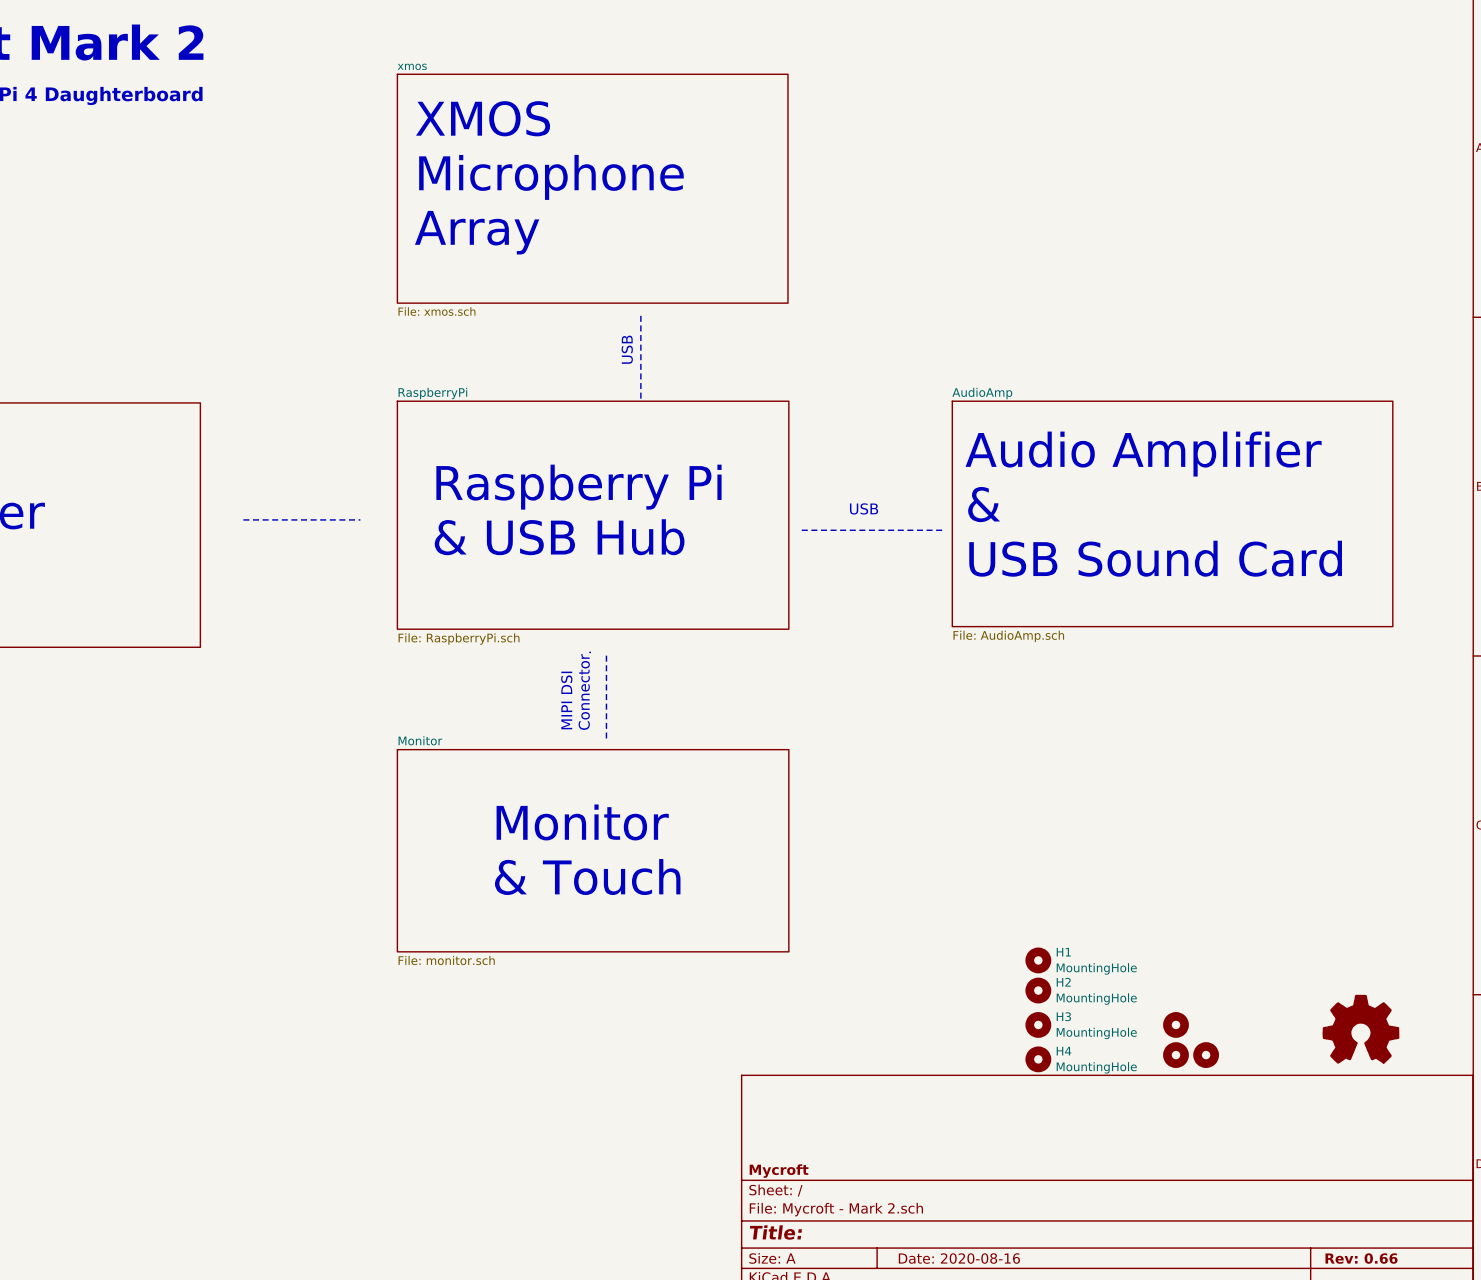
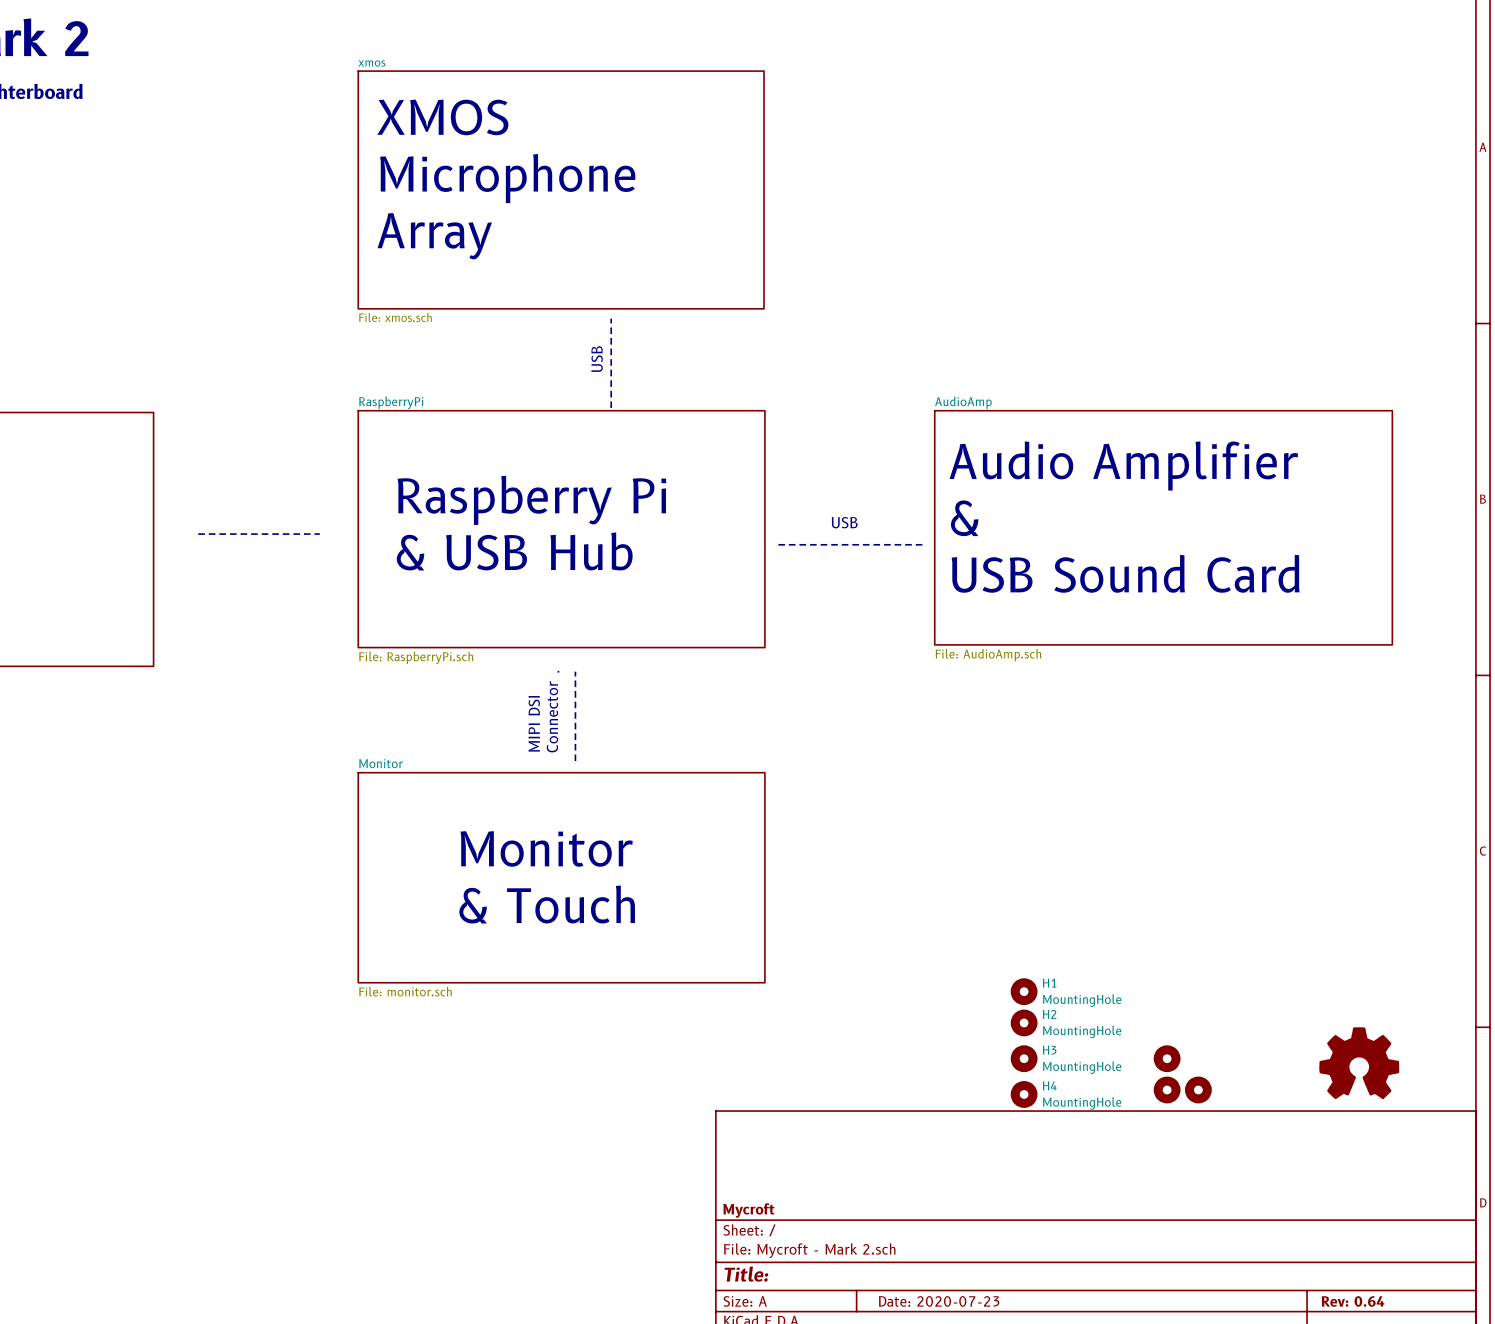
title block: Date: 2020-08-16 (959, 1258) -> Date: 2020-07-23 (939, 1301)
title block: Rev: 0.66 (1361, 1258) -> Rev: 0.64 (1353, 1301)

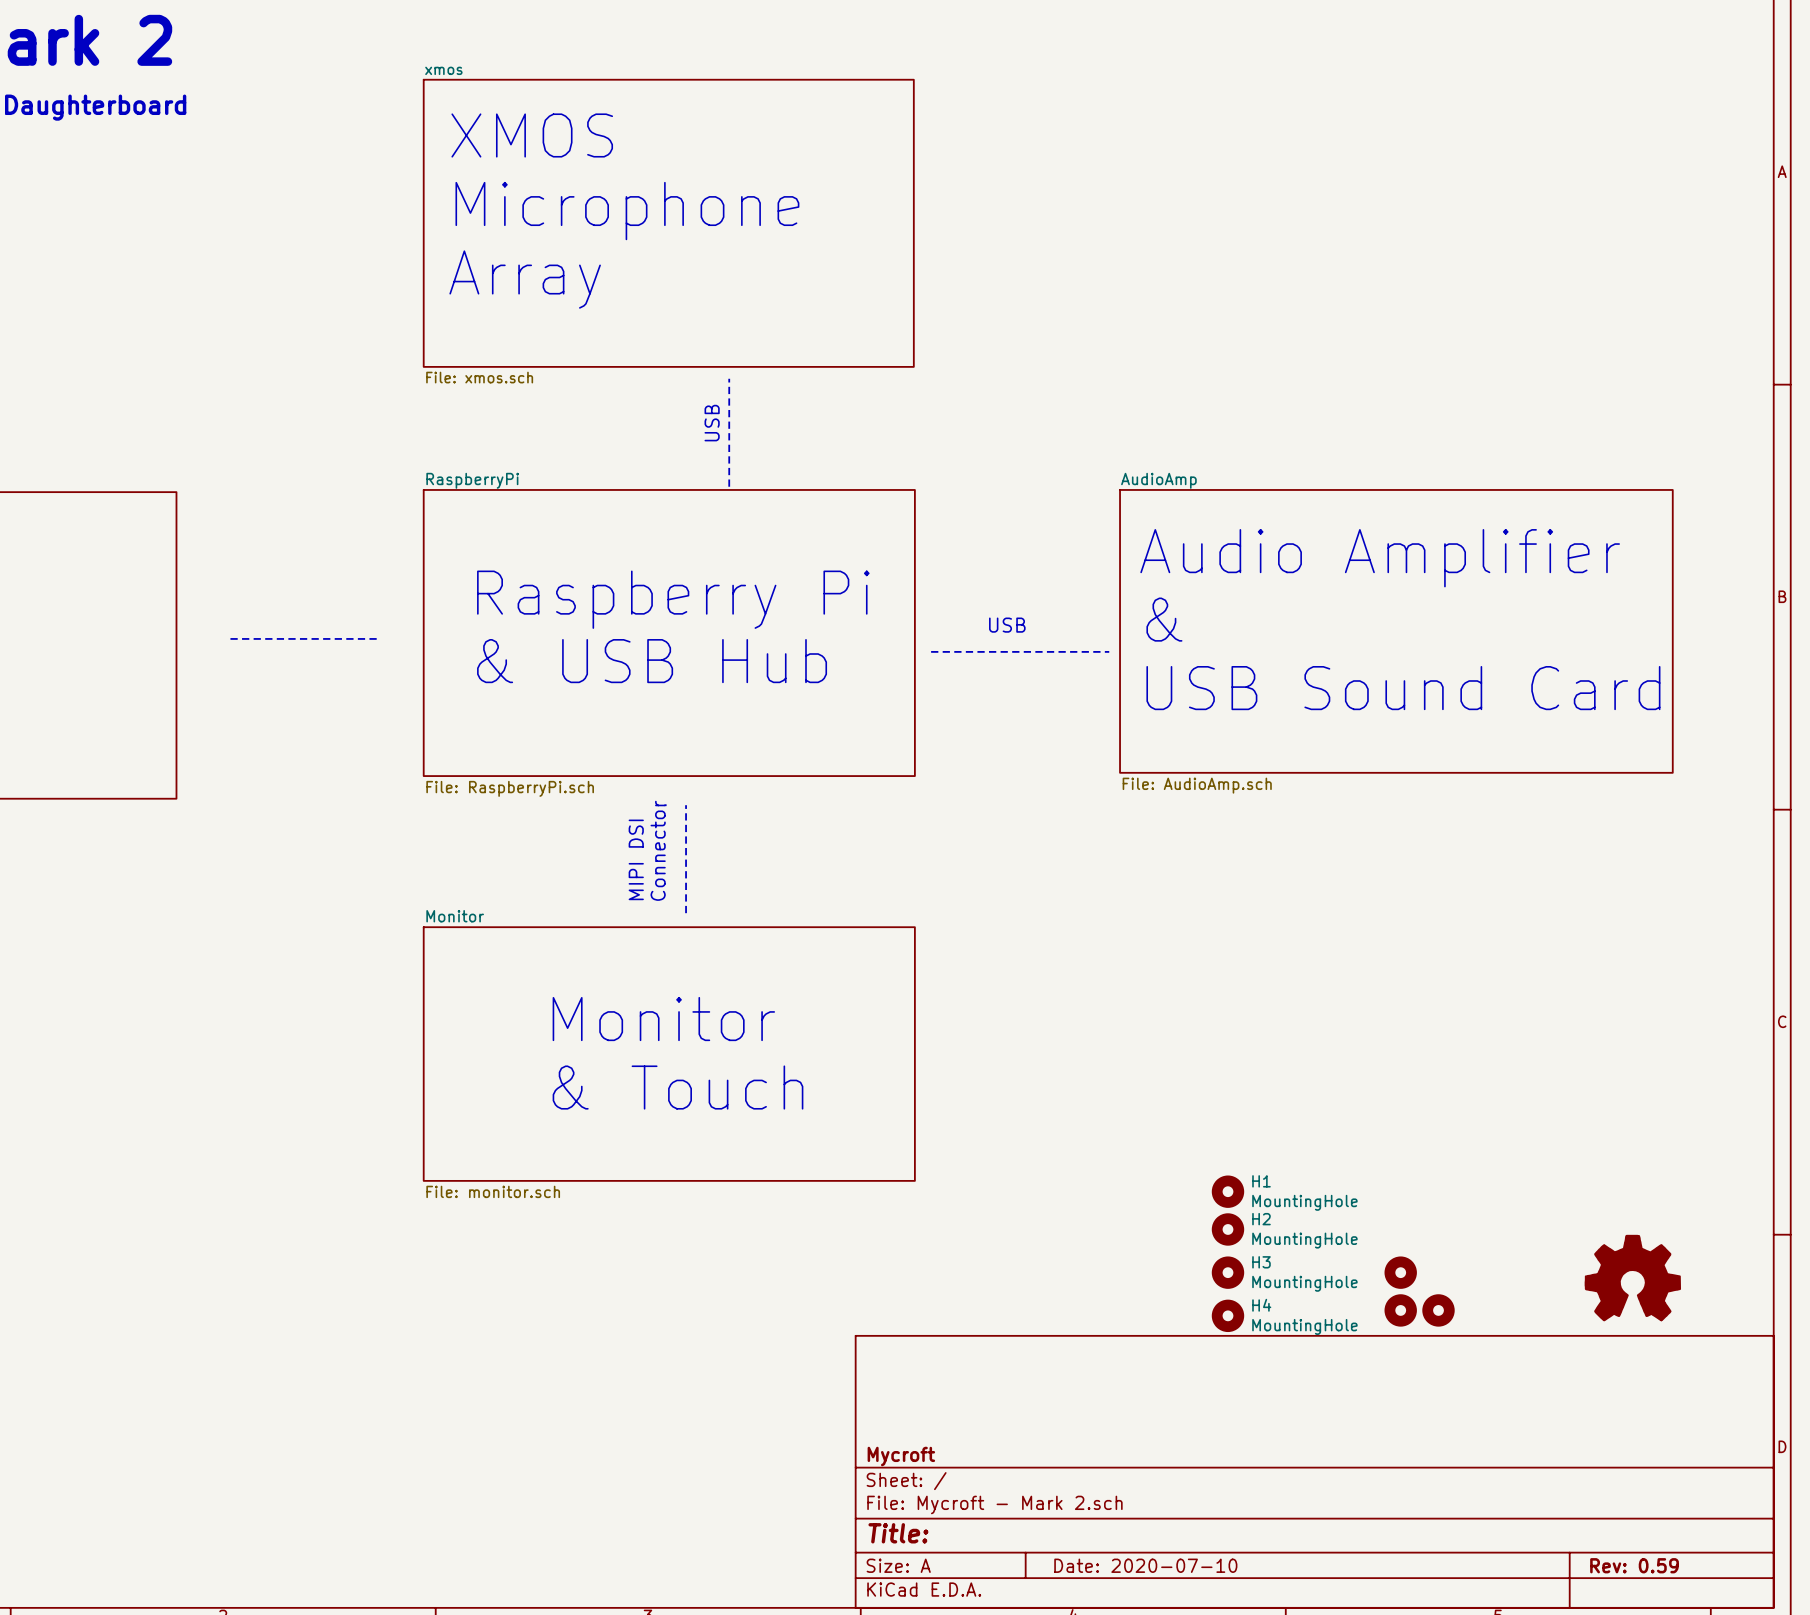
title block: Date: 2020-07-23 (939, 1301) -> Date: 2020-07-10 (1145, 1565)
title block: Rev: 0.64 (1353, 1301) -> Rev: 0.59 (1634, 1565)

